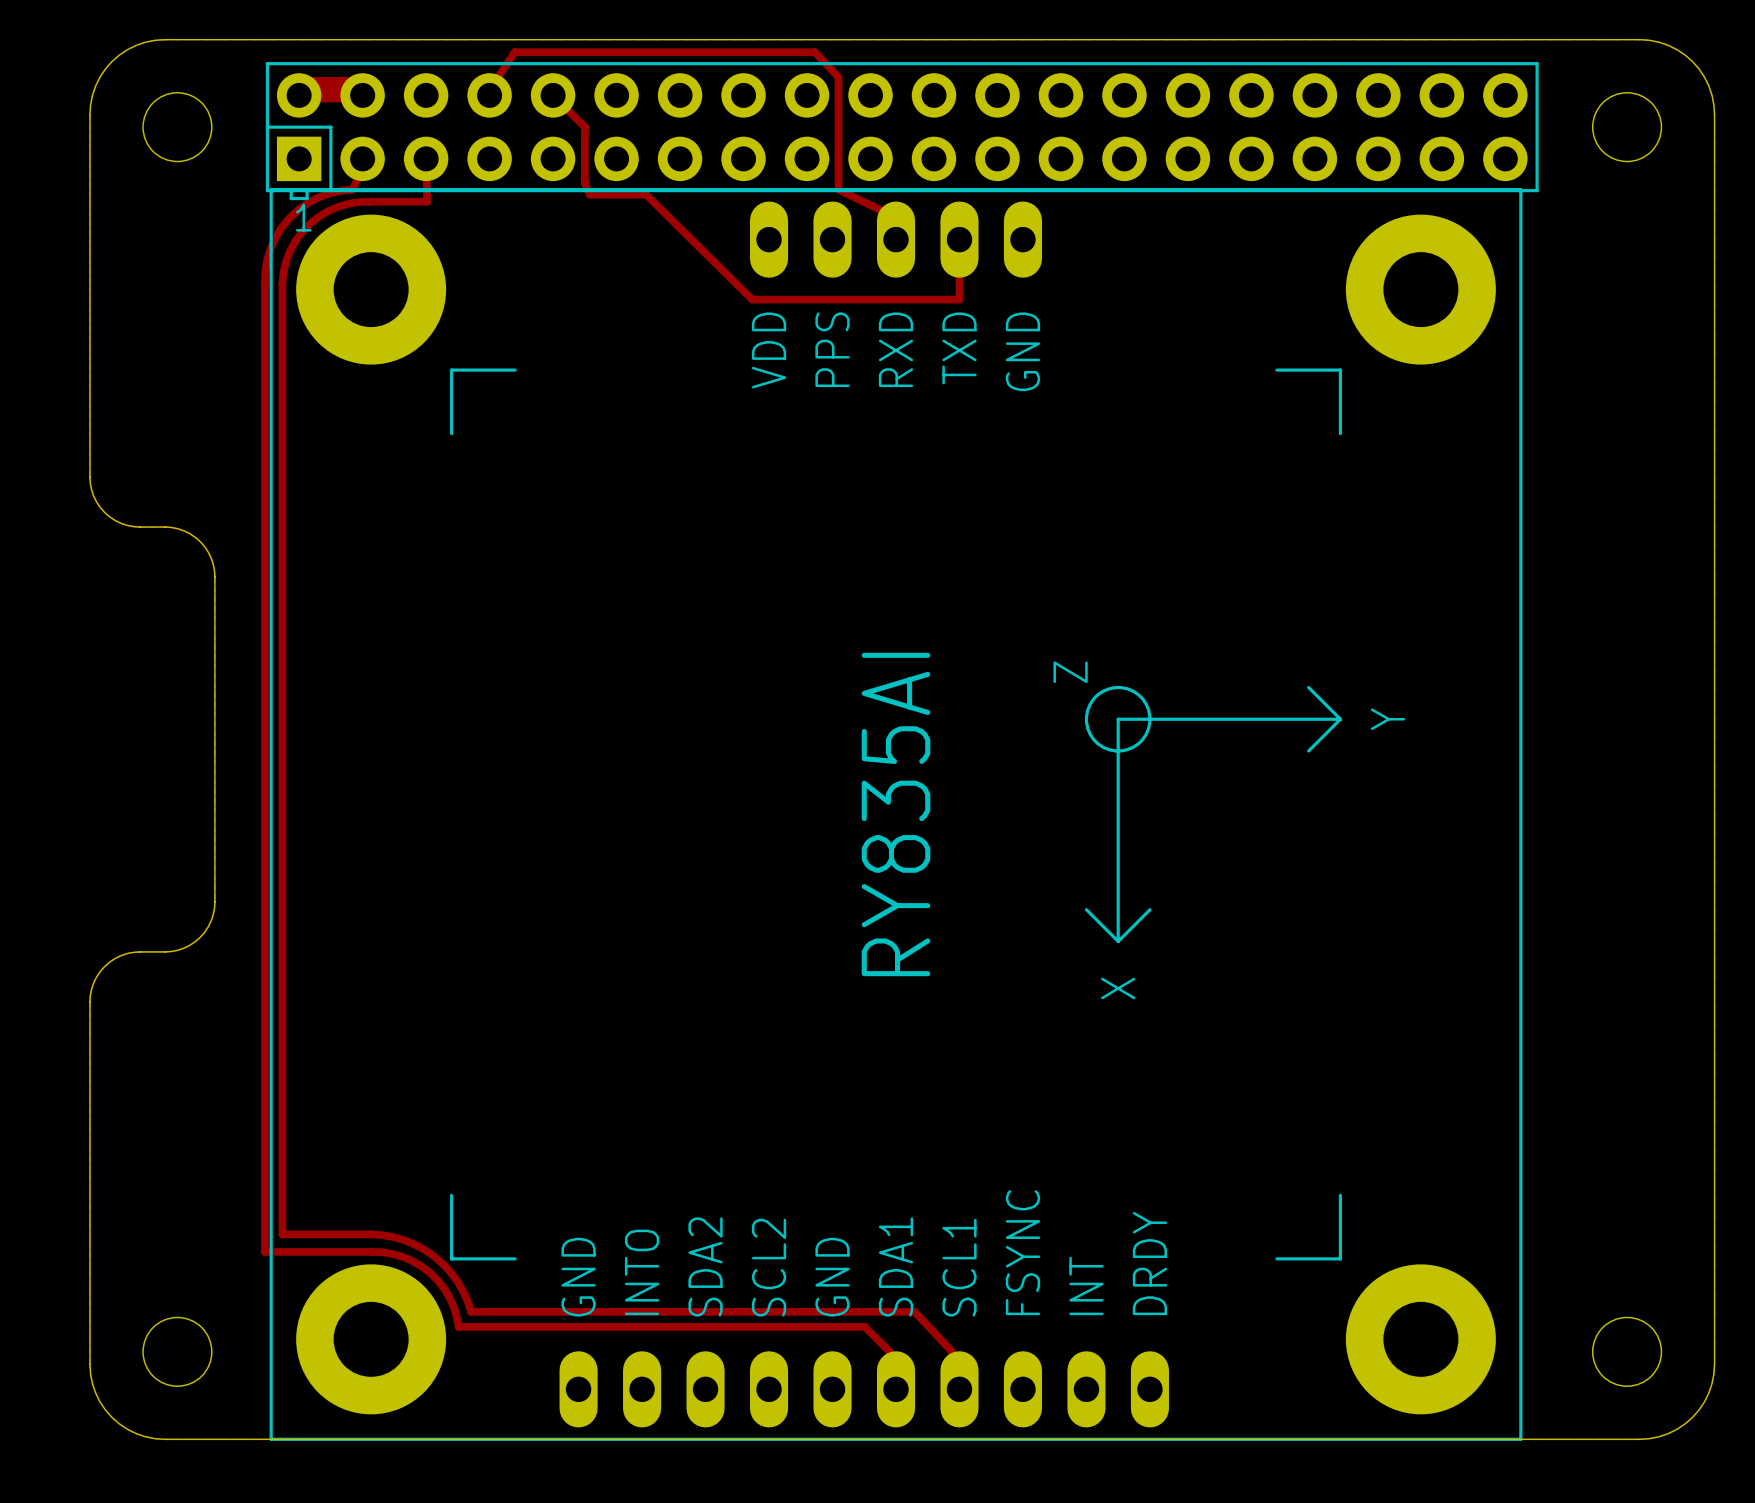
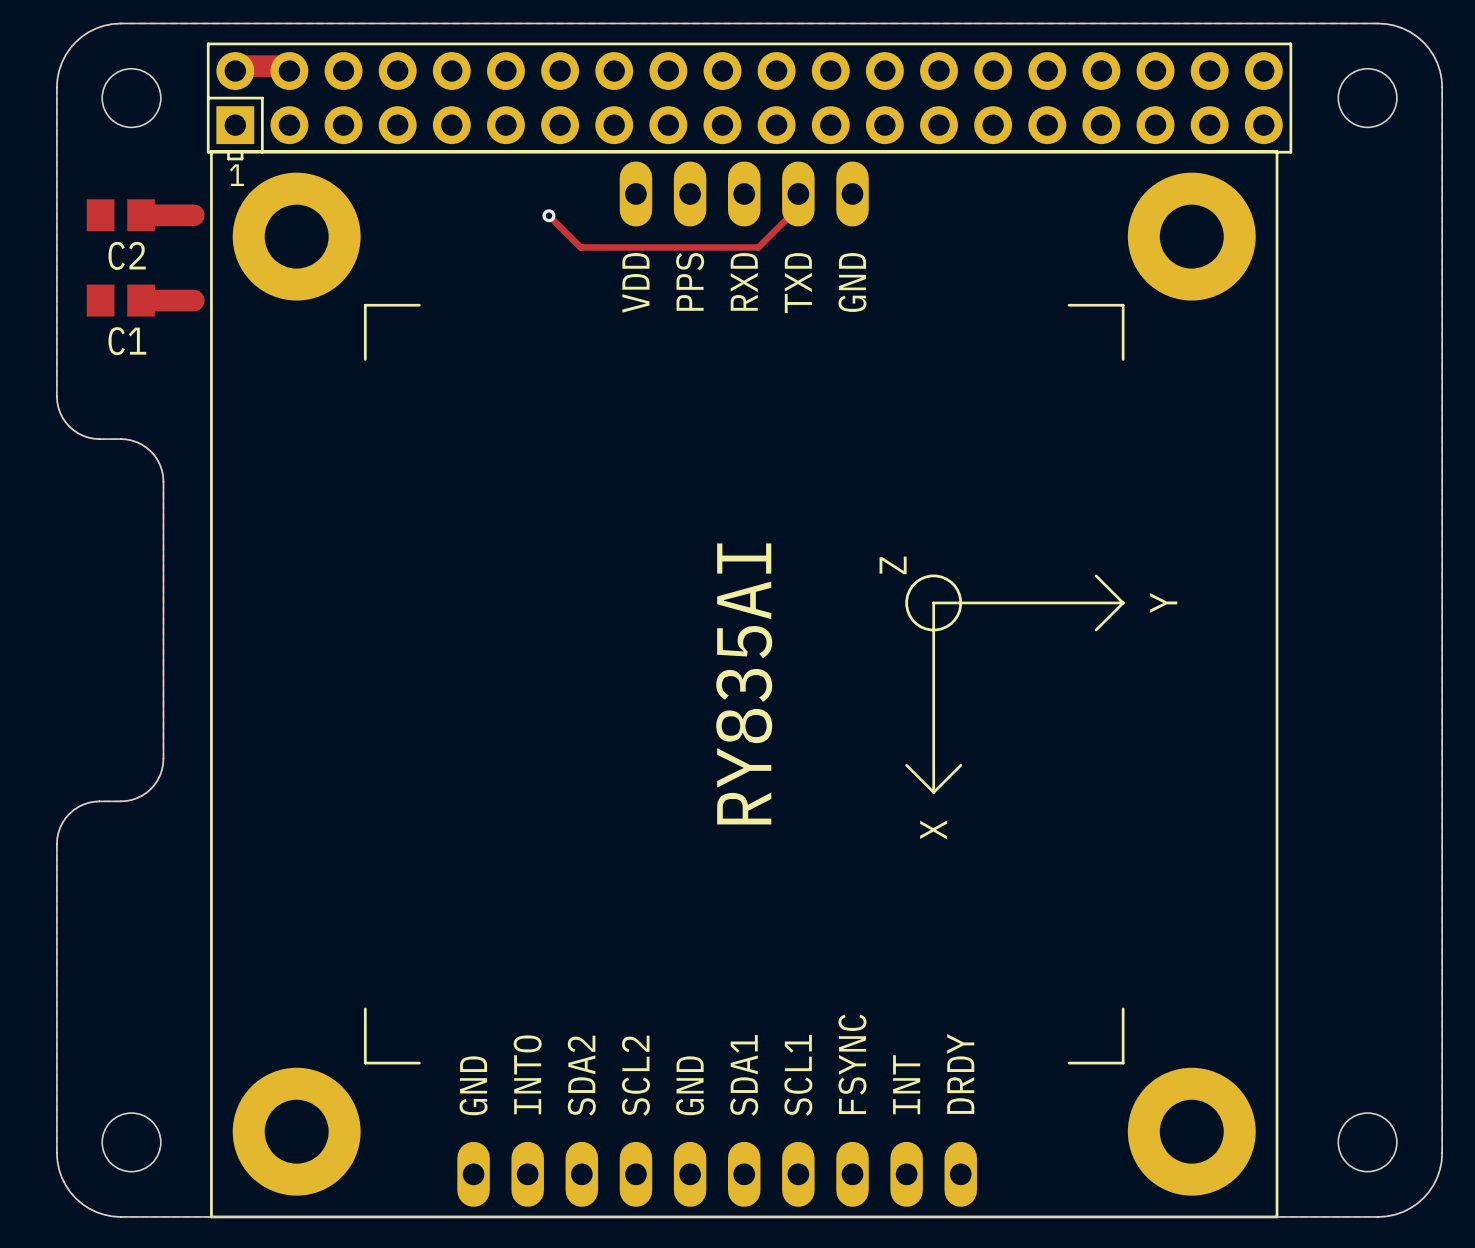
track: (489, 95) (489, 89) (514, 52) (814, 52) (838, 77) (838, 189) (889, 214) (889, 233) (896, 239) -> none
track: (553, 95) (584, 127) (584, 183) (589, 194) (646, 194) (752, 299) (959, 299) (959, 239) -> (548, 215) (580, 247) (758, 247) (797, 208) (798, 193)
track: (362, 158) (364, 164) (352, 189) (329, 193) (317, 197) (307, 203) (289, 218) (275, 237) (267, 259) (265, 271) (264, 1251) (381, 1252) (402, 1256) (421, 1266) (437, 1279) (449, 1296) (458, 1326) (864, 1326) (889, 1351) (889, 1389) (896, 1389) -> none
track: (426, 158) (427, 201) (359, 202) (327, 211) (301, 232) (290, 251) (283, 272) (282, 1234) (371, 1234) (404, 1240) (424, 1249) (450, 1272) (462, 1290) (471, 1311) (914, 1311) (952, 1351) (952, 1389) (959, 1389) -> none
C2: none -> (120, 215)
track: none -> (141, 215) (193, 215)
via: none -> (548, 215)
C1: none -> (120, 300)
track: none -> (141, 300) (193, 300)

